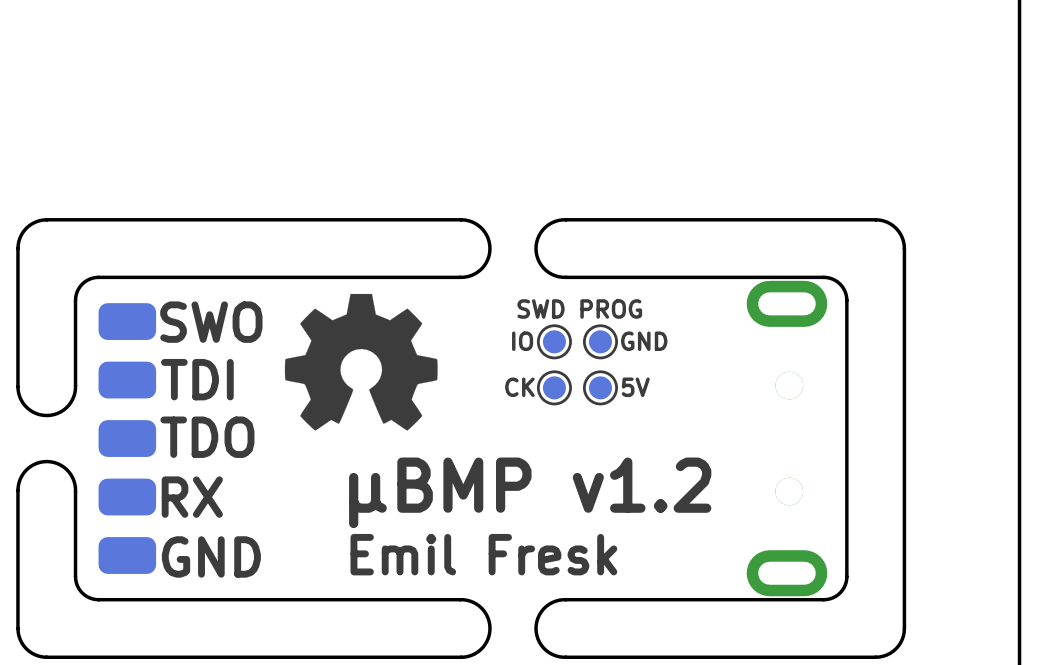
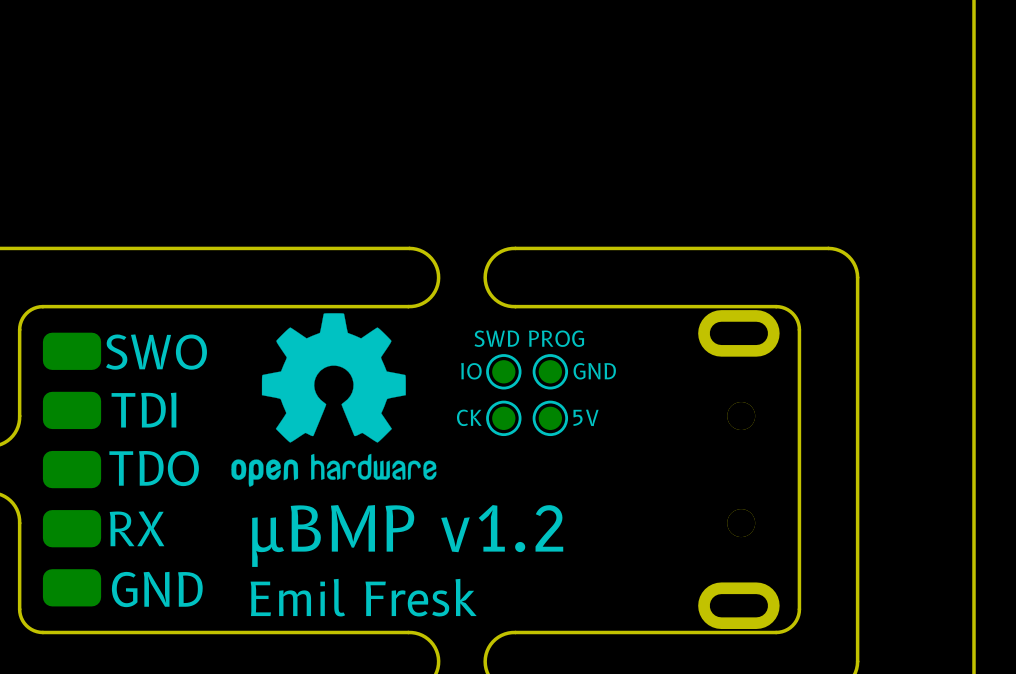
drawing: none -> [231, 313, 437, 487]
drawing: [284, 293, 438, 431] -> none
text position: µBMP v1.2 (530, 492) -> µBMP v1.2 (407, 535)
text position: Emil Fresk (483, 554) -> Emil Fresk (363, 597)

